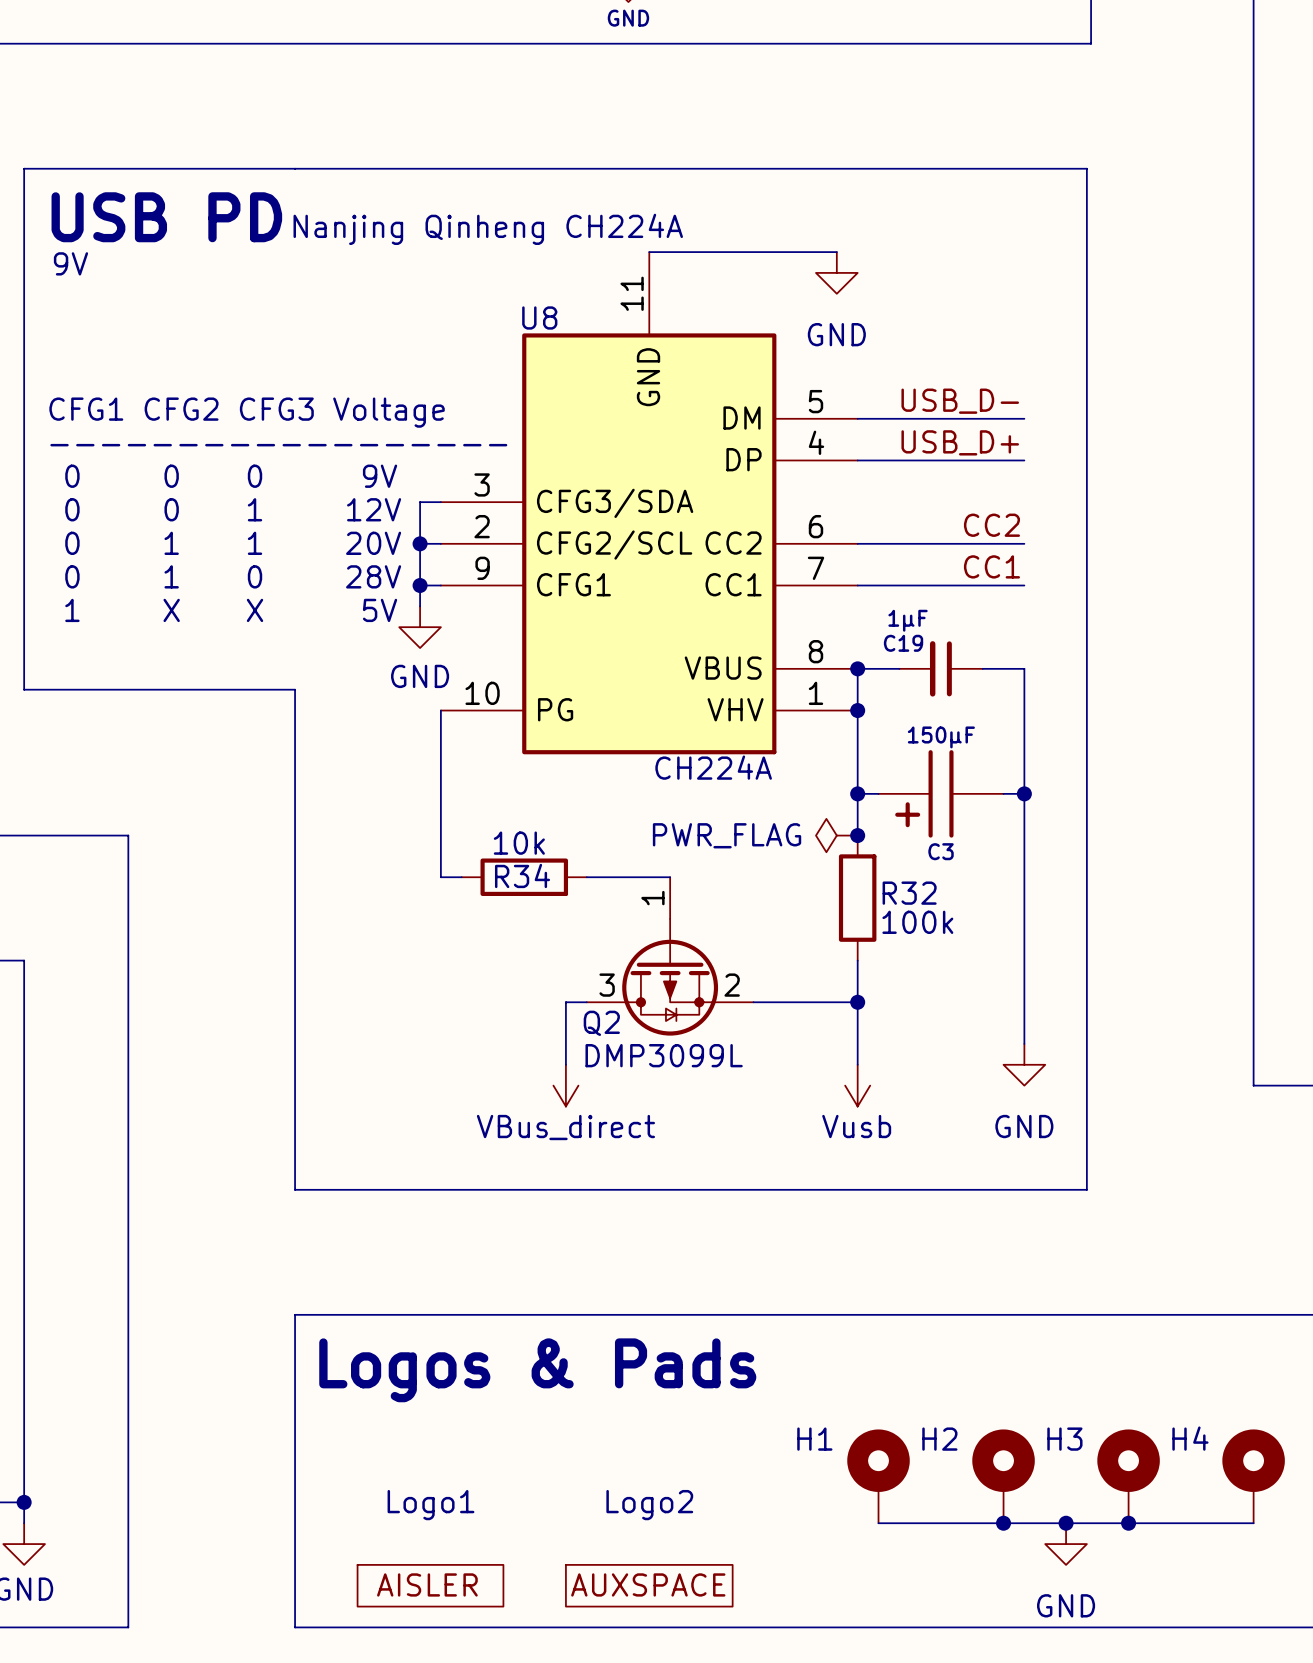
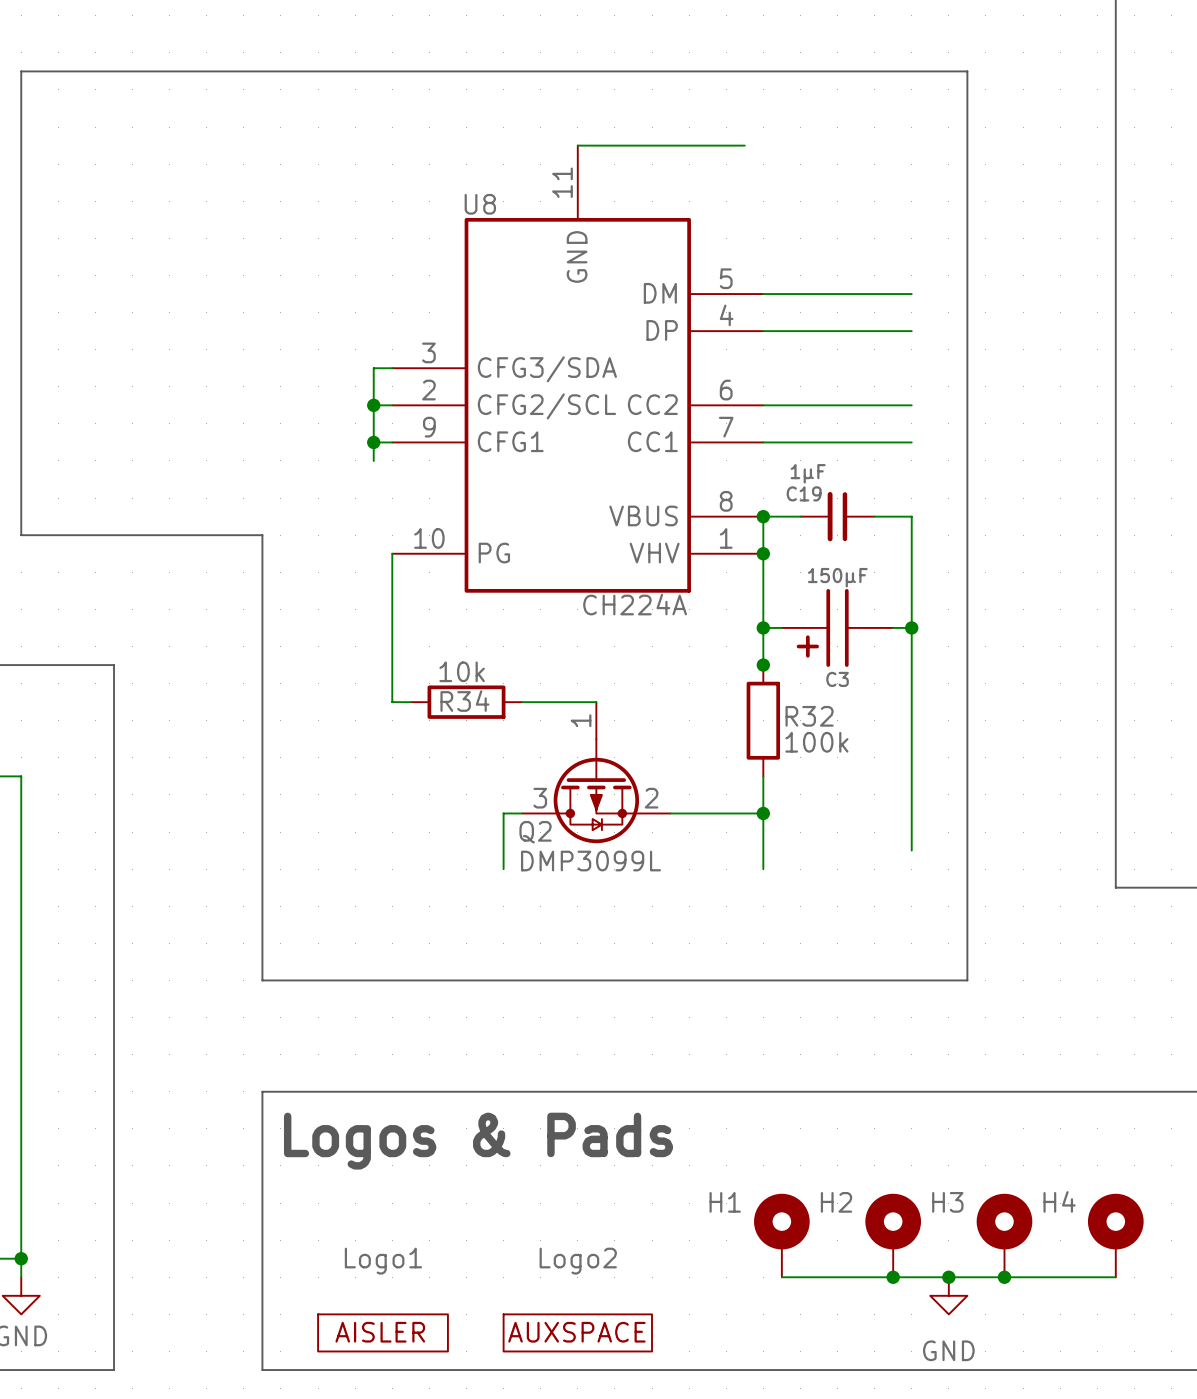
text: USB PD (166, 217) -> none
text: Nanjing Qinheng CH224A (488, 229) -> none
text: 9V (70, 263) -> none
power symbol: GND (836, 272) -> none
label: USB_D- (960, 401) -> none
text: CFG1 CFG2 CFG3 Voltage (247, 412) -> none
label: USB_D+ (960, 442) -> none
text: ------------------ (278, 445) -> none
text: 0 0 0 9V (231, 476) -> none
text: 0 0 1 12V (233, 509) -> none
label: CC2 (991, 525) -> none
text: 0 1 1 20V (233, 543) -> none
label: CC1 (991, 566) -> none
text: 0 1 0 28V (233, 576) -> none
text: 1 X X 5V (231, 610) -> none
power symbol: GND (420, 627) -> none
power symbol: PWR_FLAG (836, 835) -> none
power symbol: GND (1024, 1064) -> none
power symbol: VBus_direct (565, 1085) -> none
power symbol: Vusb (857, 1085) -> none

